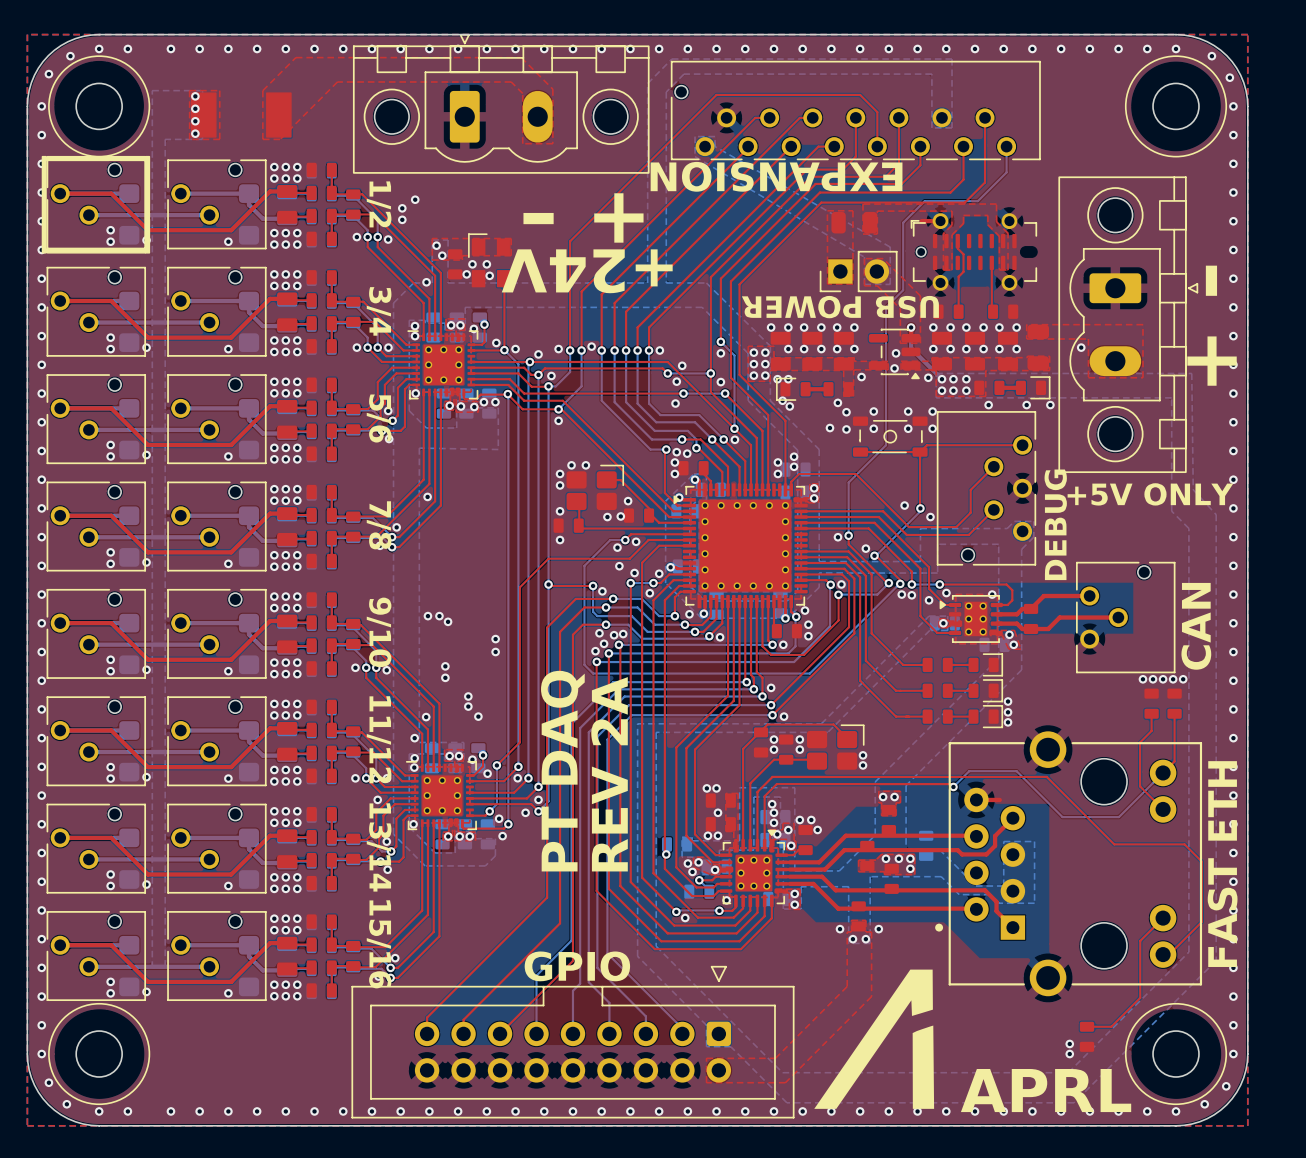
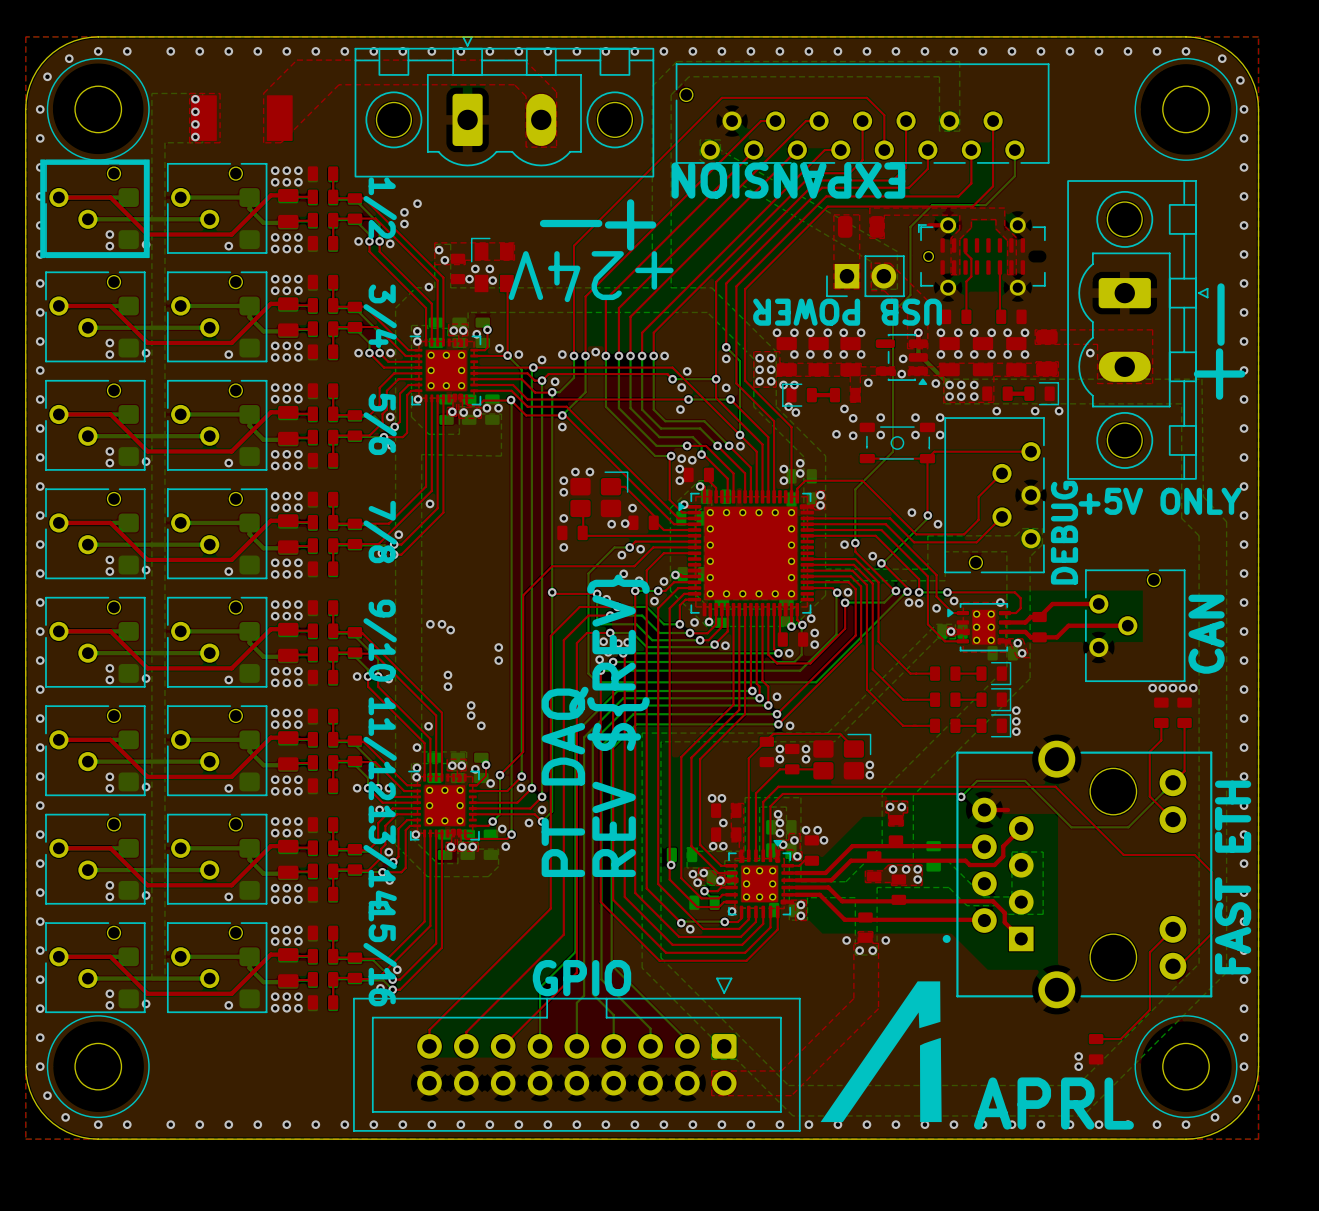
text: REV 2A (609, 774) -> REV ${REV} (618, 725)

